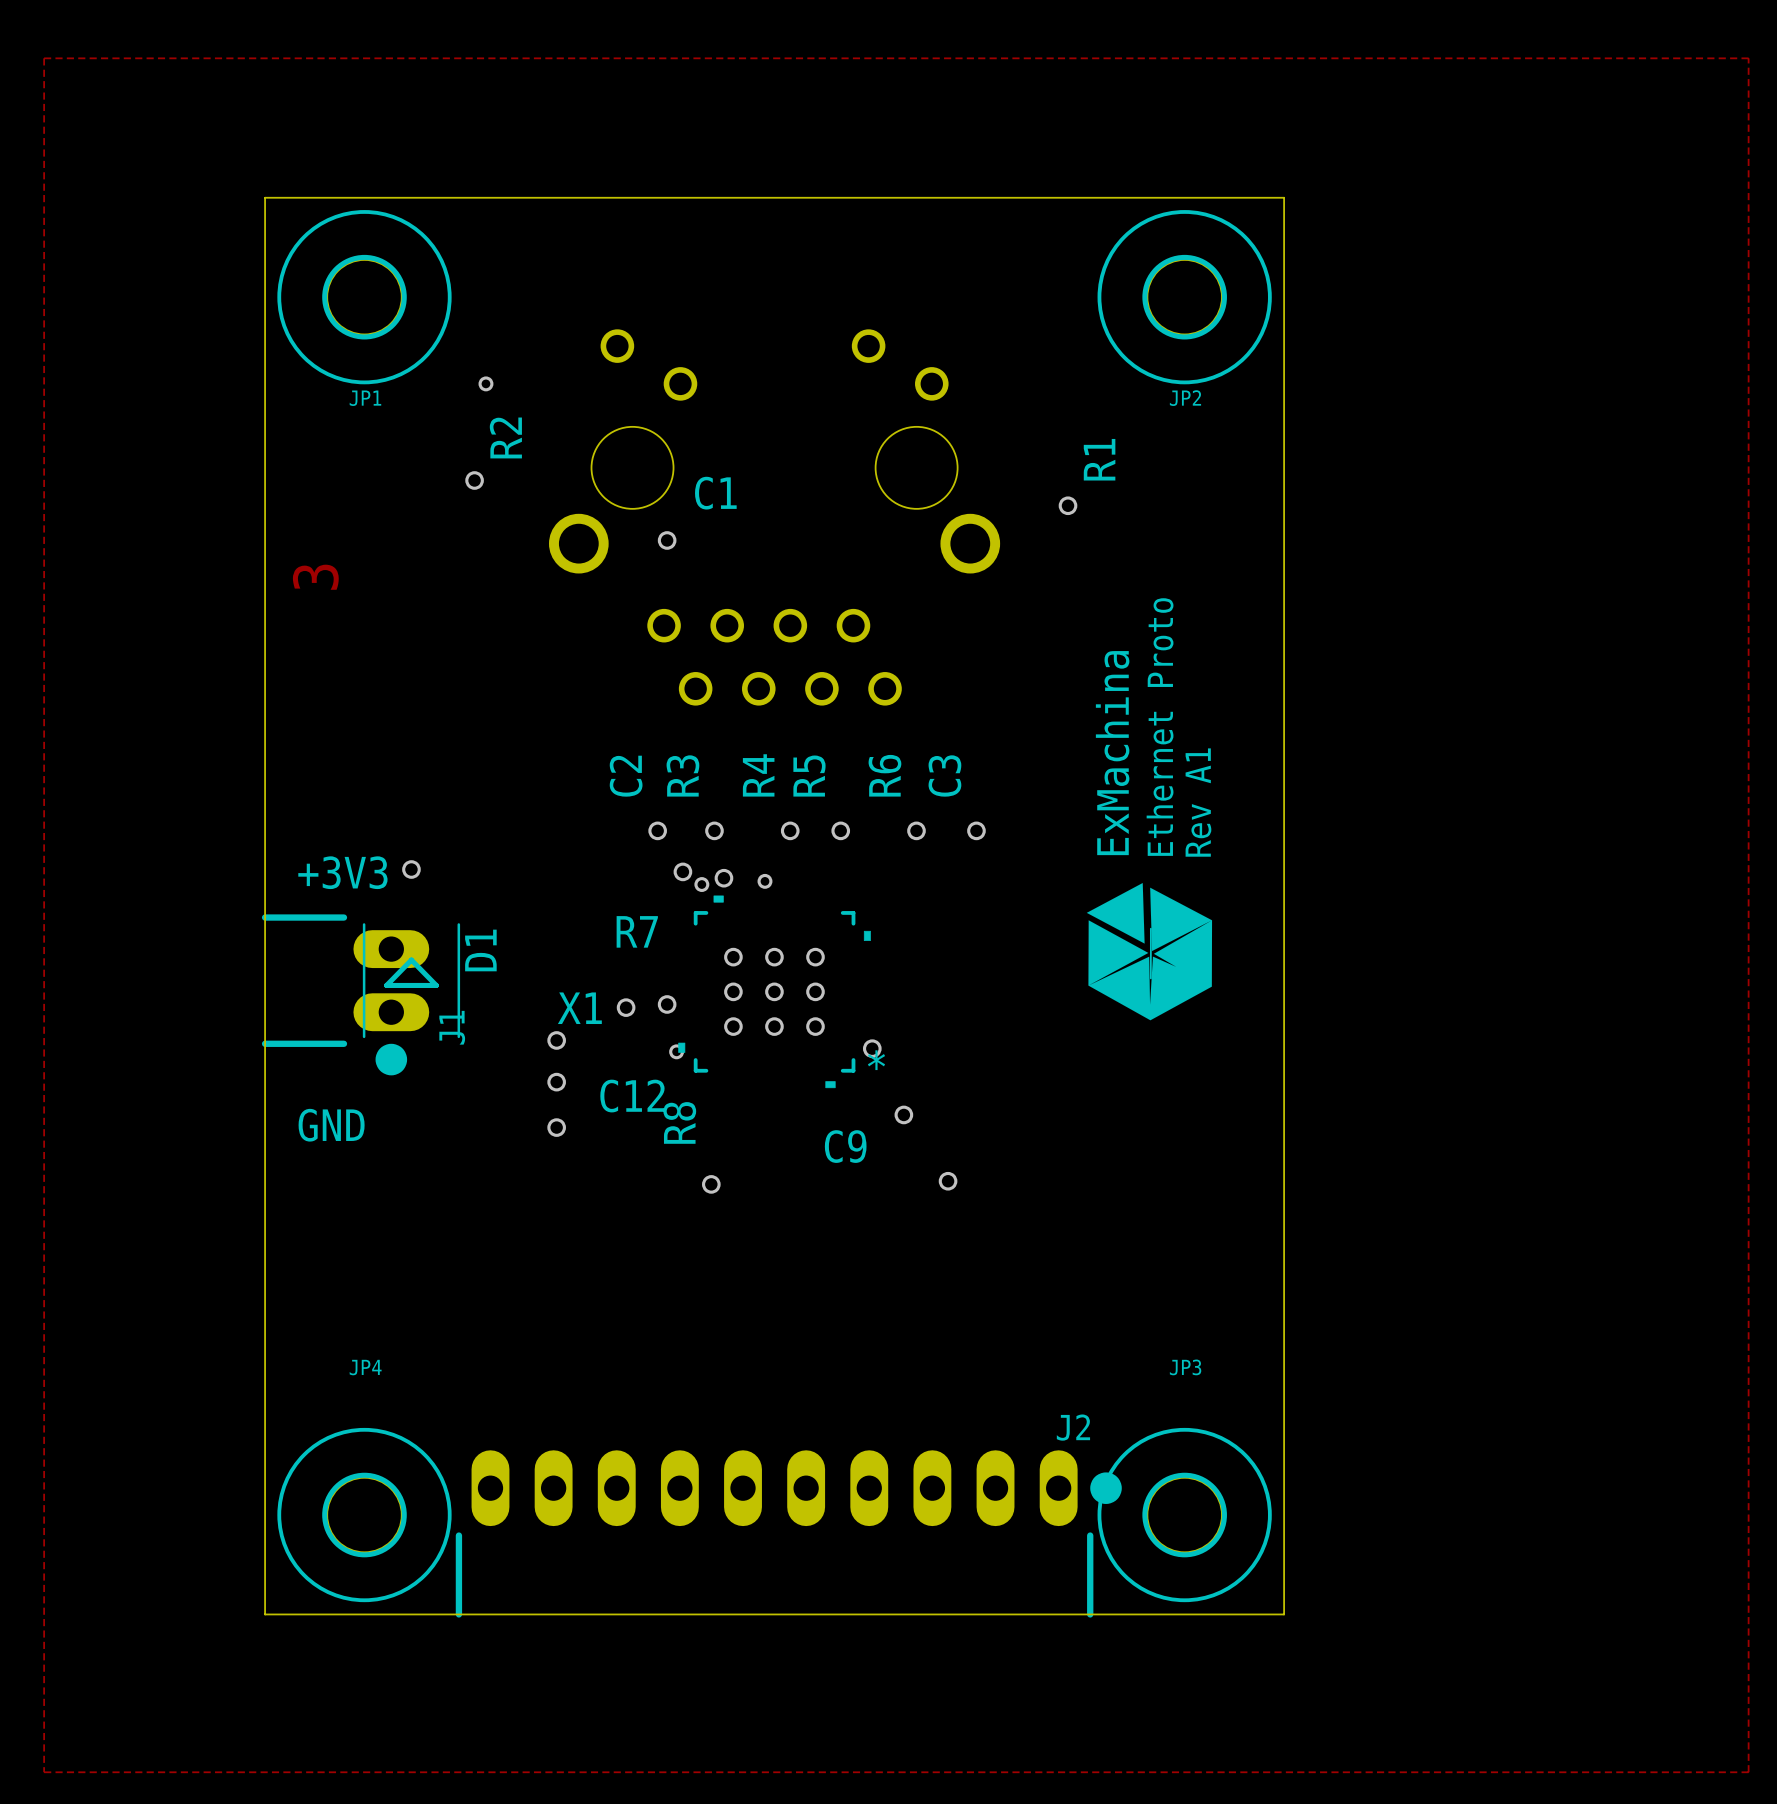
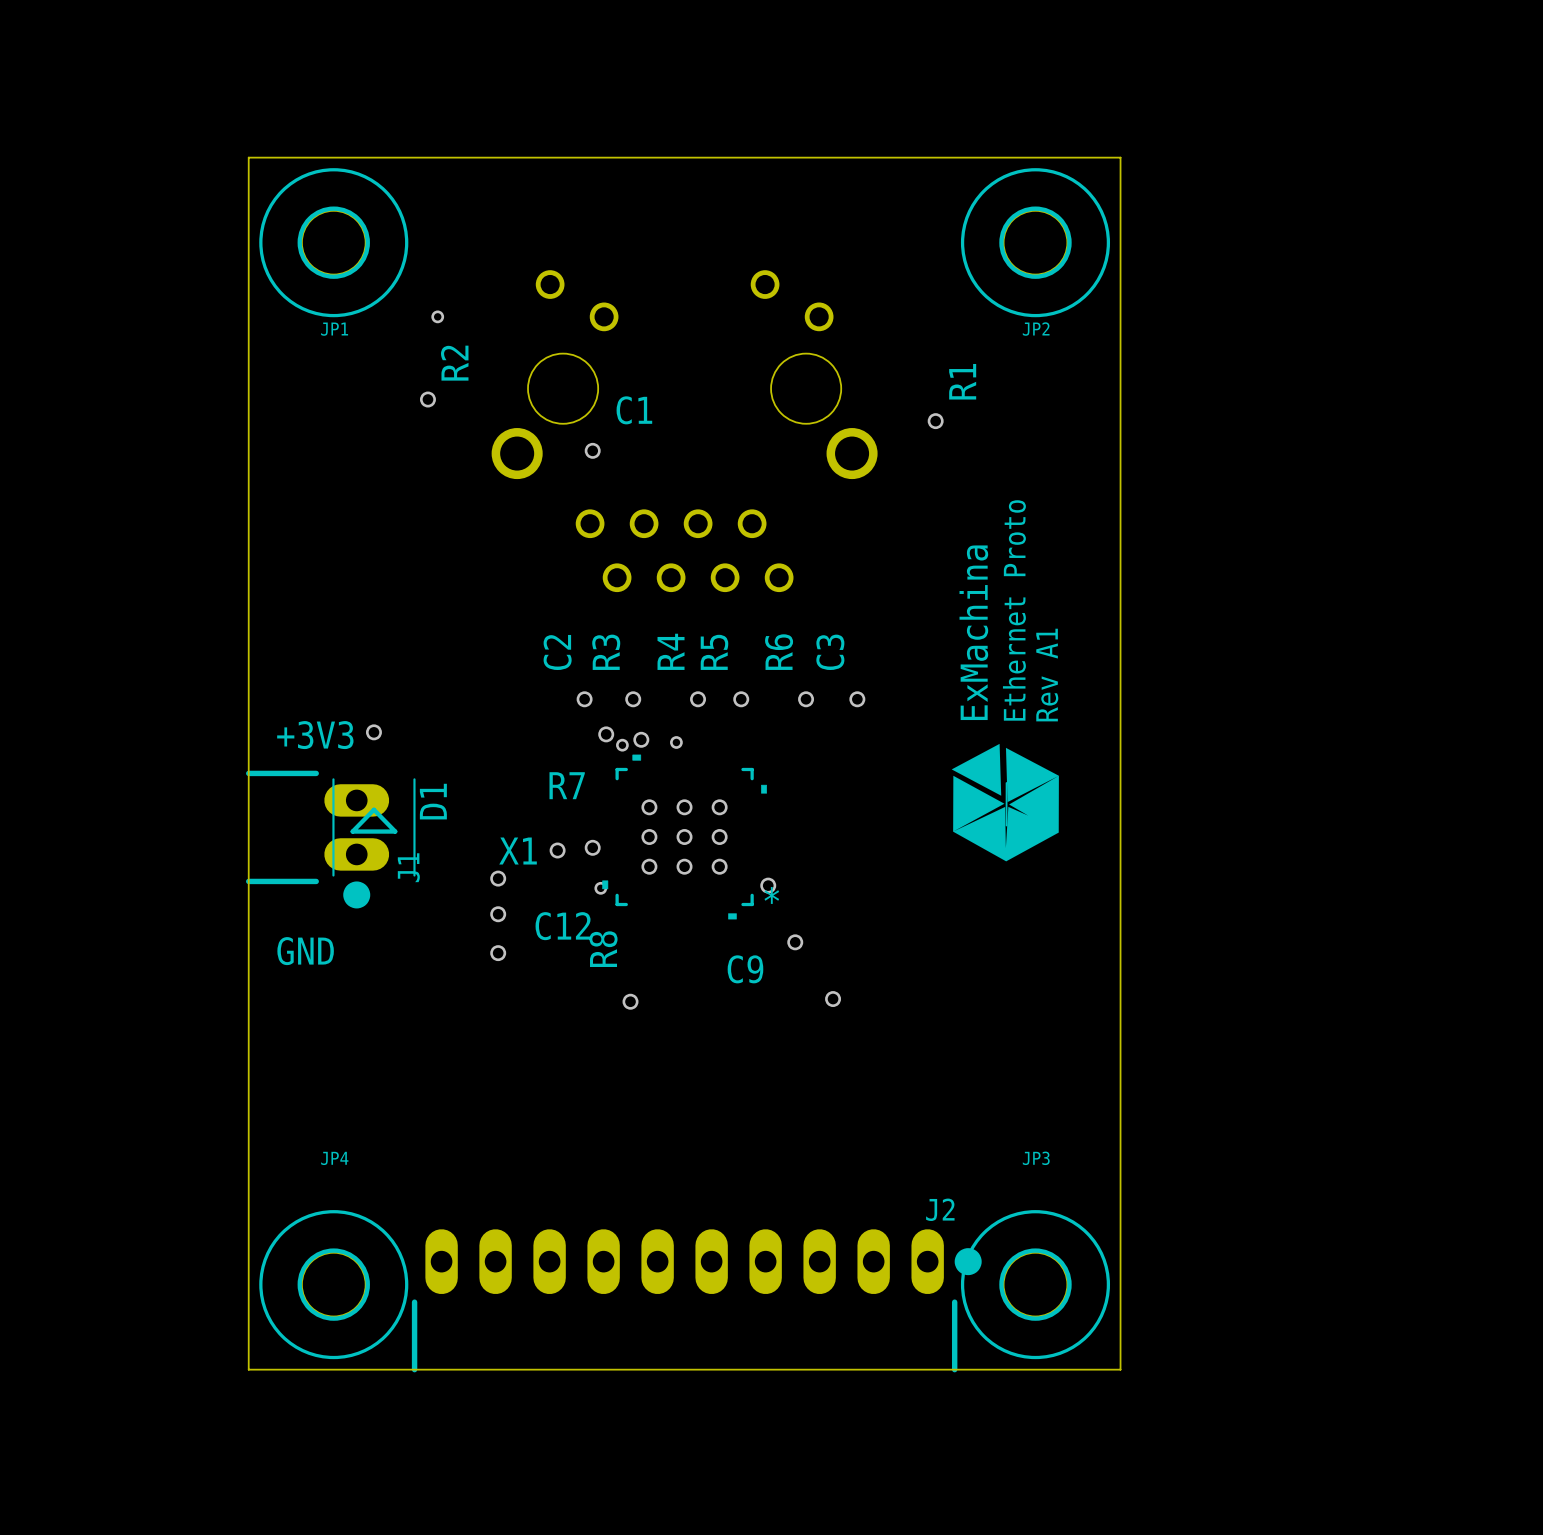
zone outline: (44, 58) (1748, 58) (1748, 1772) (44, 1772) (44, 58) -> none
text: 3 (315, 577) -> none

